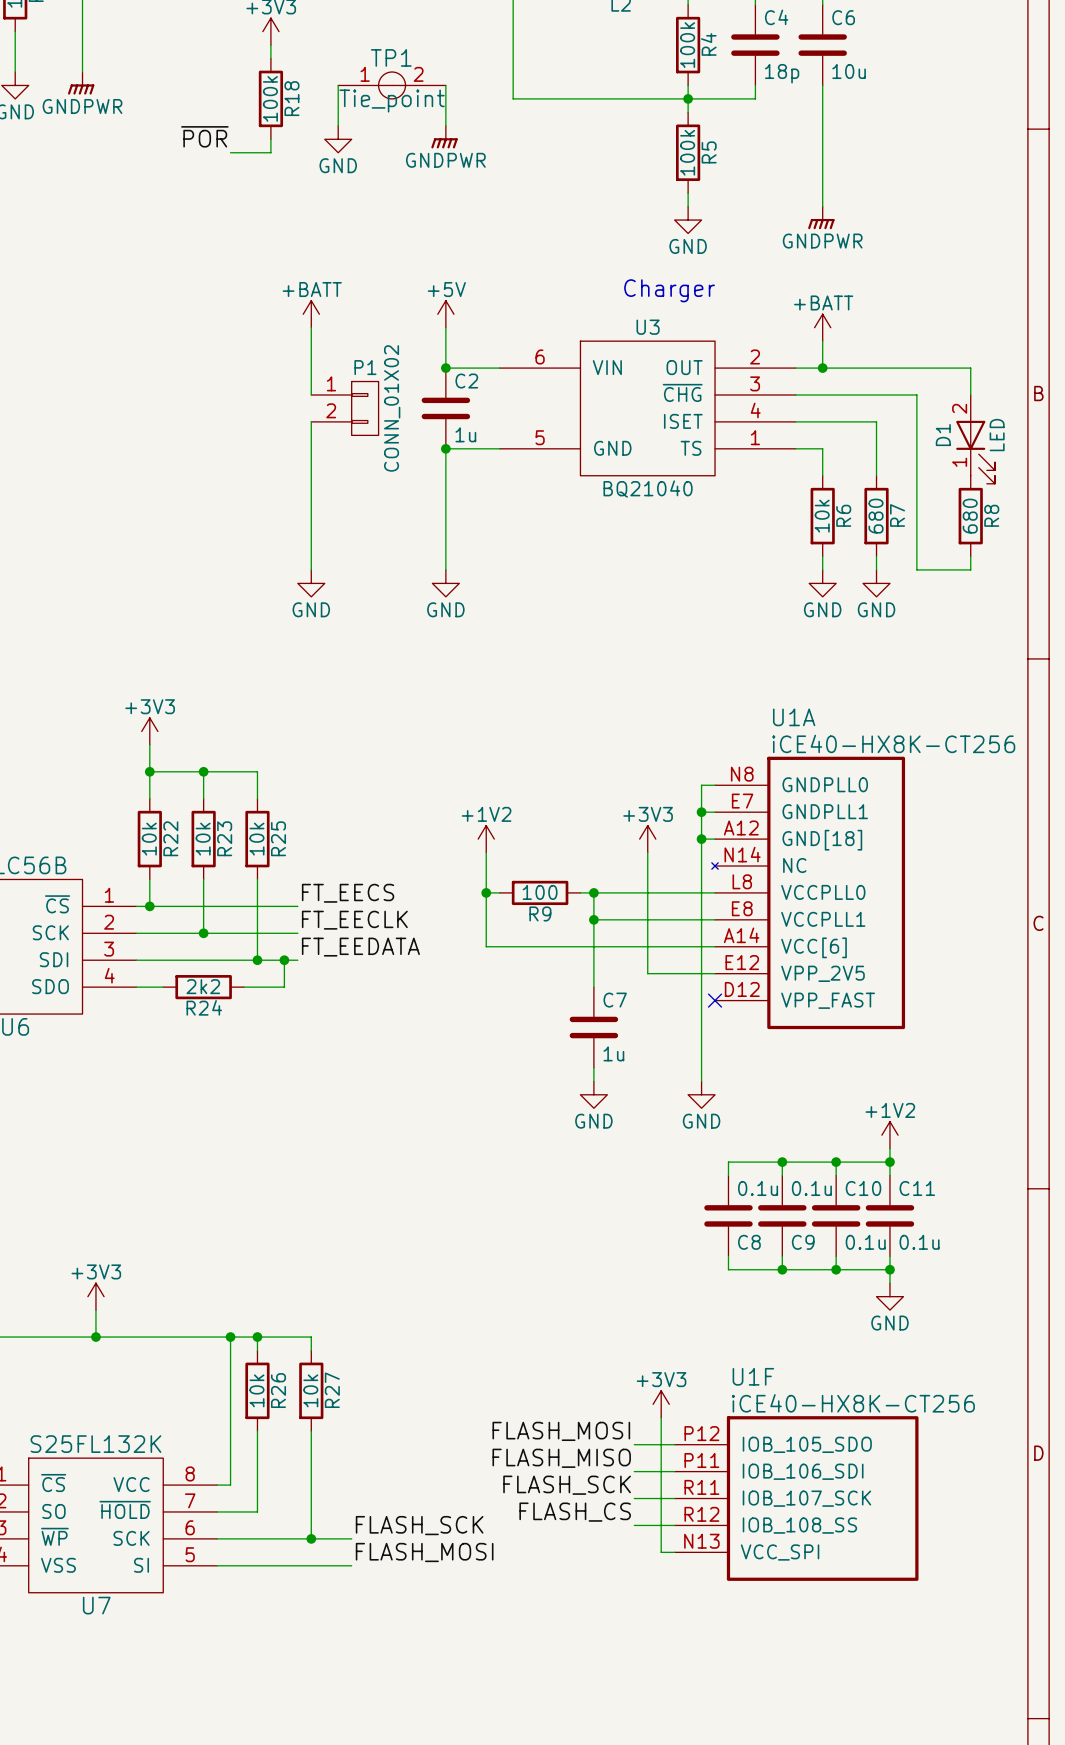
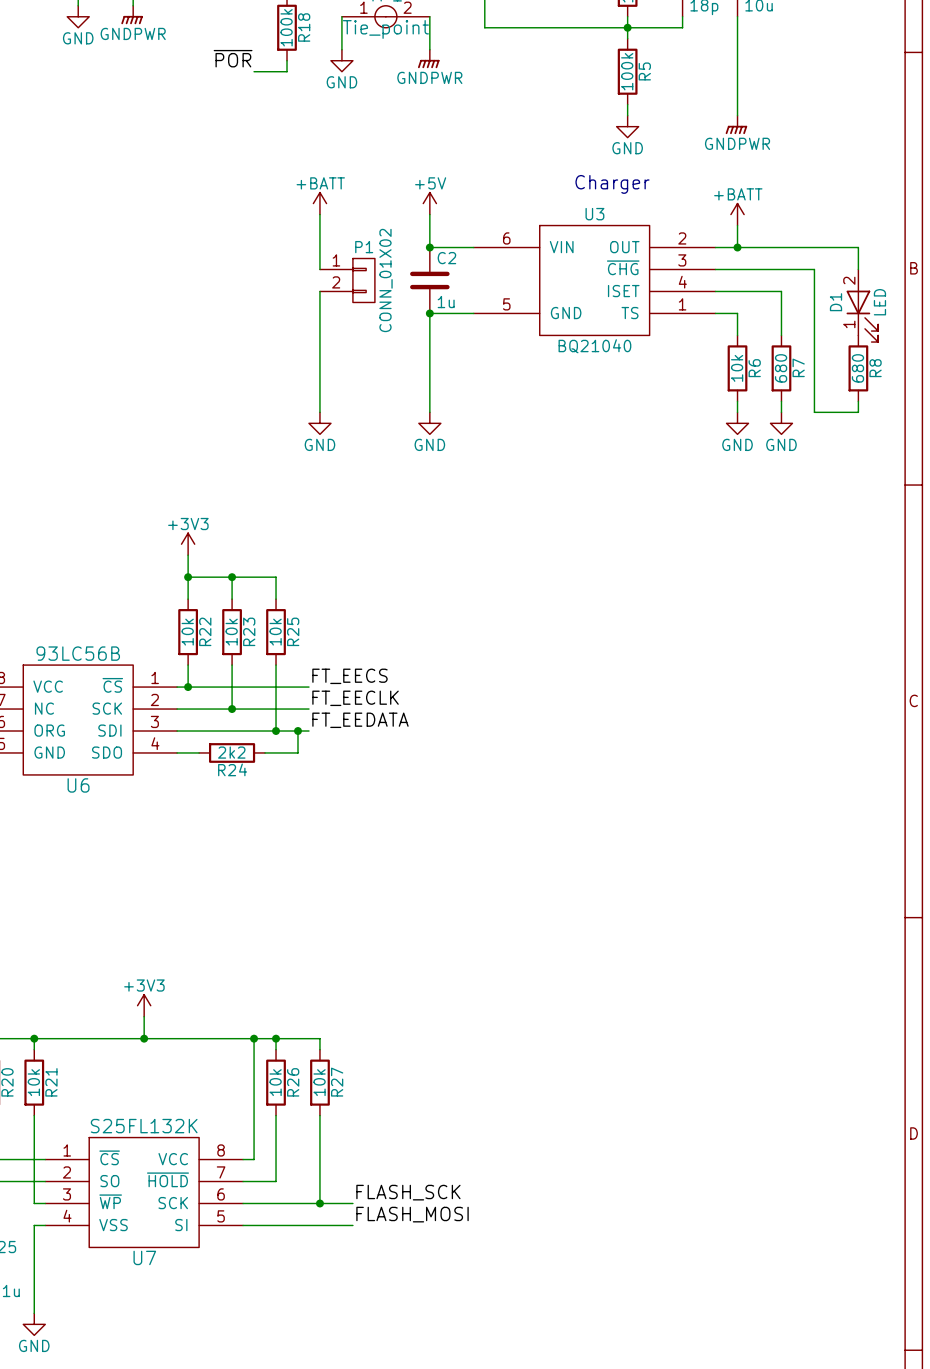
wire: (715, 785) (701, 785) (701, 1081) -> none
wire: (701, 812) (715, 812) -> none
junction: (701, 812) -> none
power symbol: +1V2 (486, 839) -> none
power symbol: +3V3 (647, 839) -> none
wire: (701, 839) (715, 839) -> none
junction: (701, 839) -> none
wire: (486, 852) (486, 946) (715, 946) -> none
wire: (647, 852) (647, 973) (715, 973) -> none
wire: (486, 892) (499, 892) -> none
junction: (486, 892) -> none
R9: 100 (540, 892) -> none
wire: (580, 892) (715, 892) -> none
wire: (593, 892) (593, 987) -> none
junction: (593, 892) -> none
U1A: iCE40-HX8K-CT256 (808, 892) -> none
wire: (593, 919) (715, 919) -> none
junction: (593, 919) -> none
no-connect mark: (715, 1000) -> none
C7: 1u (593, 1027) -> none
wire: (593, 1067) (593, 1081) -> none
power symbol: GND (593, 1094) -> none
power symbol: GND (701, 1094) -> none
power symbol: +1V2 (889, 1135) -> none
wire: (889, 1148) (889, 1175) -> none
wire: (782, 1162) (782, 1175) -> none
junction: (782, 1162) -> none
wire: (836, 1162) (836, 1175) -> none
junction: (836, 1162) -> none
wire: (889, 1162) (728, 1162) (728, 1175) -> none
junction: (889, 1162) -> none
C8: 0.1u (728, 1215) -> none
C9: 0.1u (782, 1215) -> none
C10: 0.1u (836, 1215) -> none
C11: 0.1u (889, 1215) -> none
wire: (728, 1256) (728, 1269) (889, 1269) -> none
wire: (782, 1256) (782, 1269) -> none
wire: (836, 1256) (836, 1269) -> none
wire: (889, 1256) (889, 1283) -> none
junction: (782, 1269) -> none
junction: (836, 1269) -> none
junction: (889, 1269) -> none
power symbol: GND (889, 1296) -> none
power symbol: +3V3 (661, 1404) -> none
wire: (661, 1417) (661, 1552) (674, 1552) -> none
label: FLASH_MOSI (561, 1431) -> none
wire: (634, 1444) (674, 1444) -> none
label: FLASH_MISO (561, 1458) -> none
wire: (634, 1471) (674, 1471) -> none
label: FLASH_SCK (567, 1485) -> none
wire: (634, 1498) (674, 1498) -> none
U1F: iCE40-HX8K-CT256 (796, 1498) -> none
label: FLASH_CS (575, 1512) -> none
wire: (634, 1525) (674, 1525) -> none

